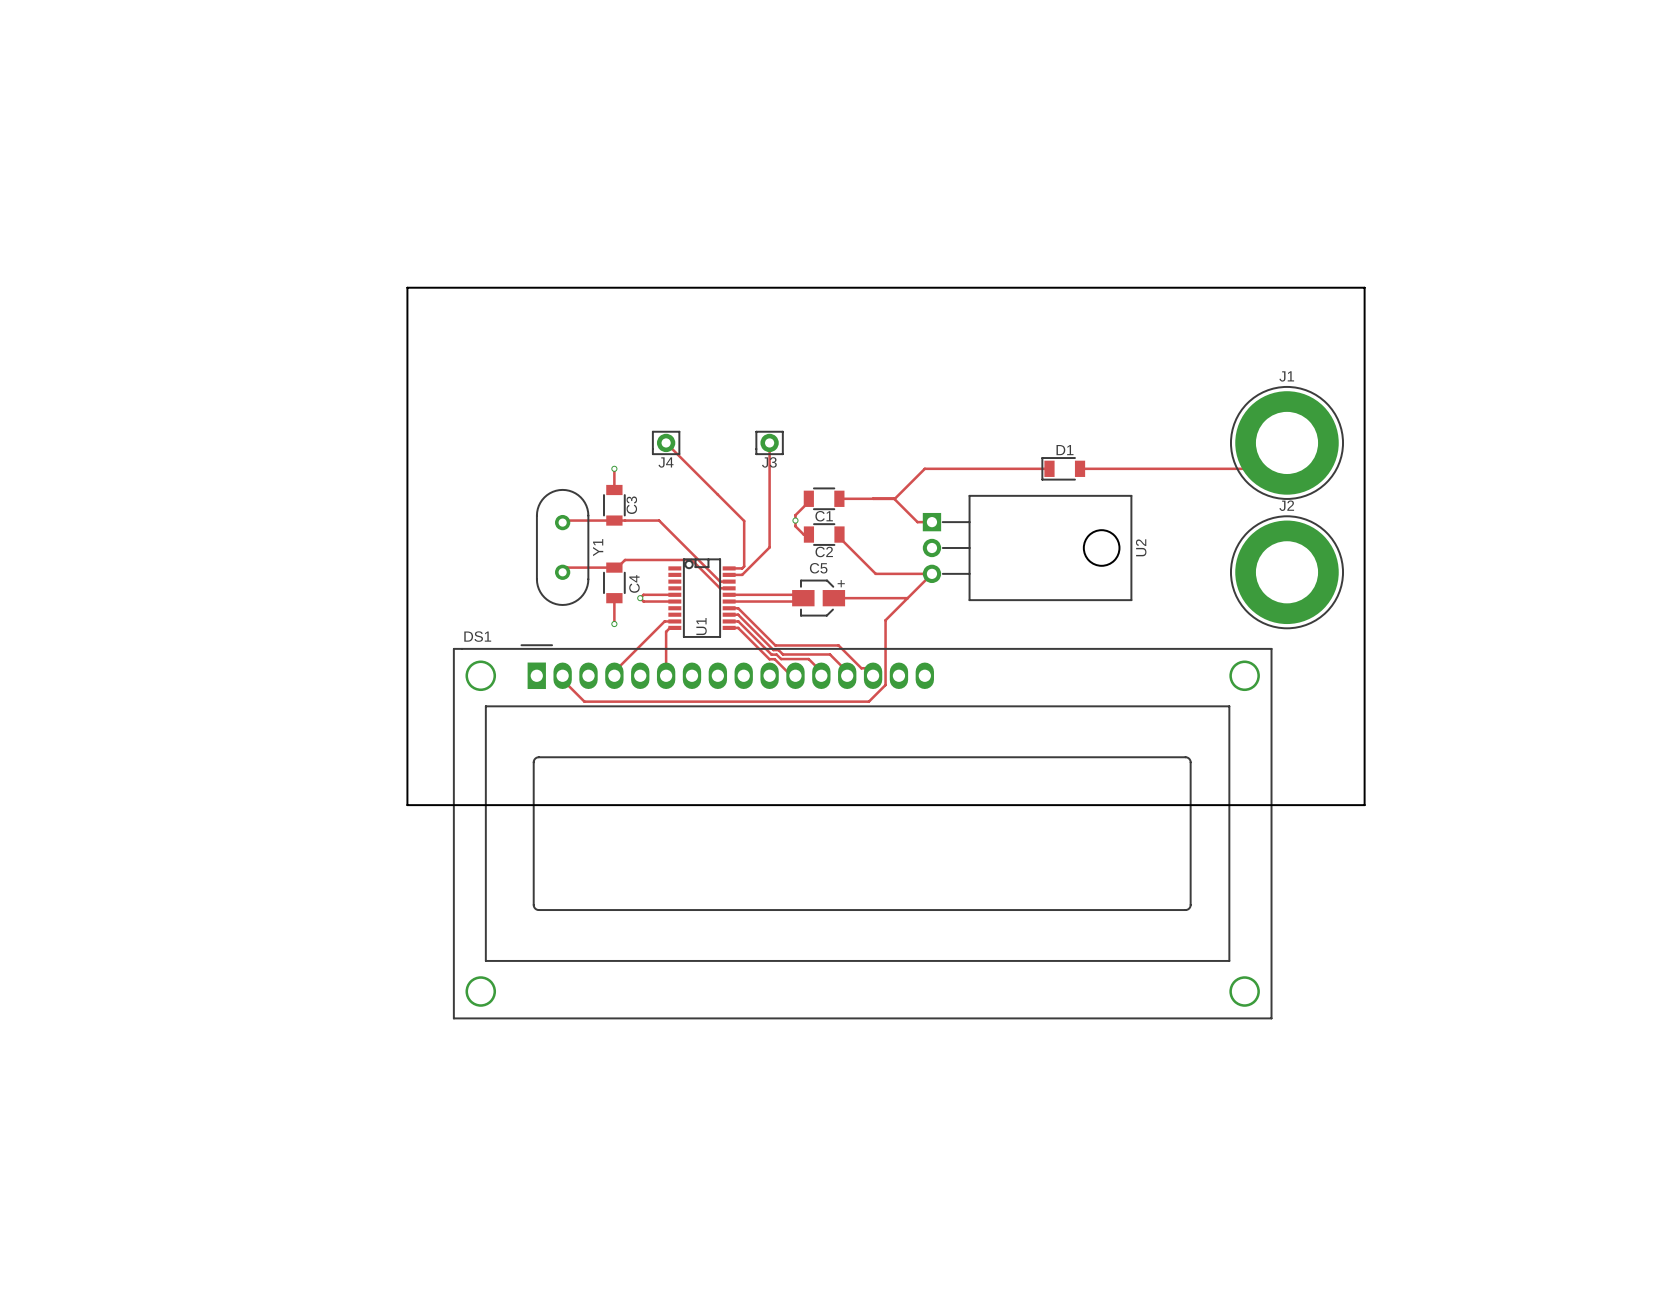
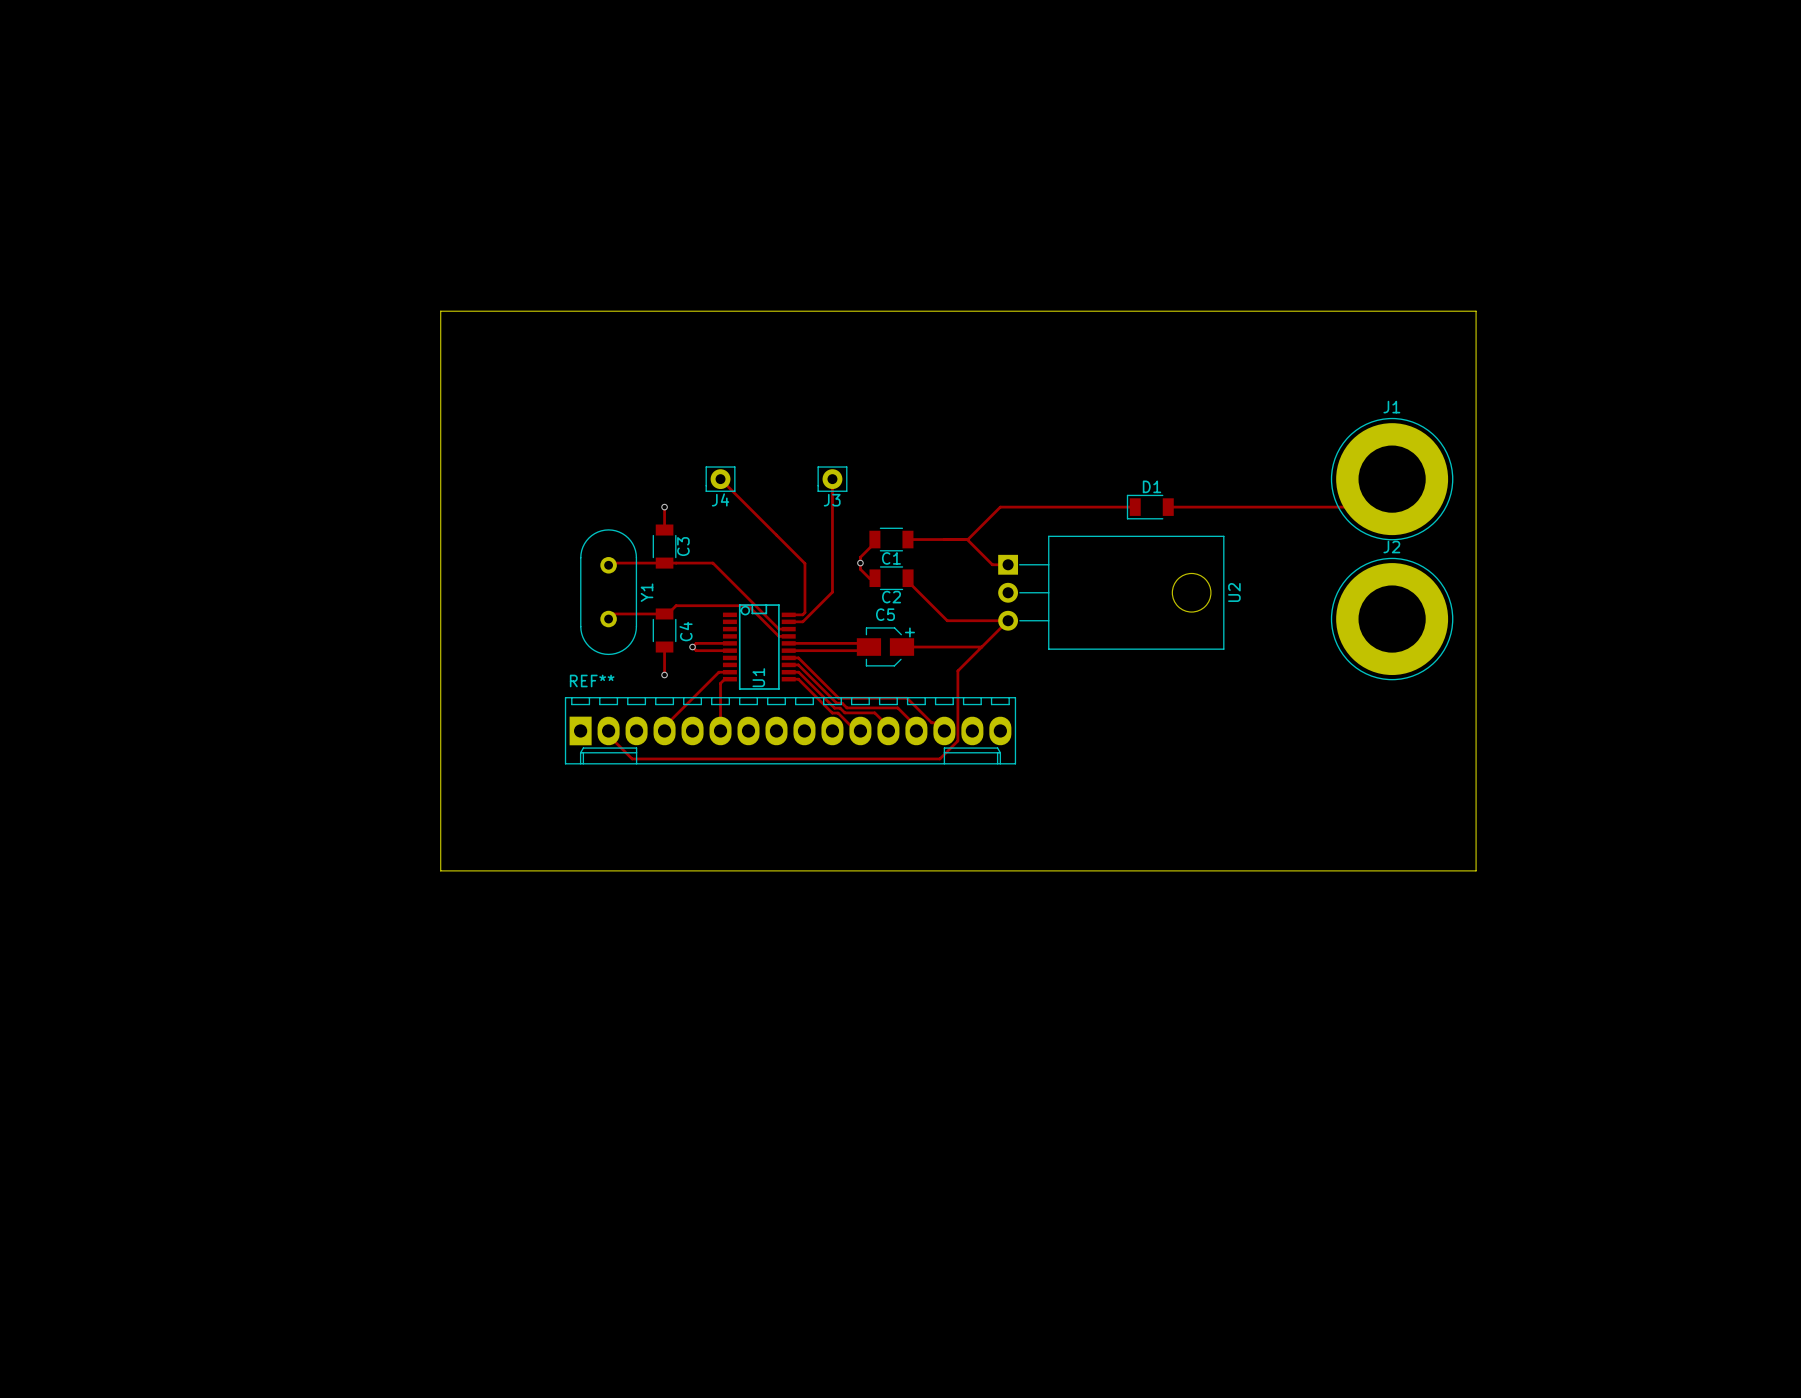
REF**: none -> (790, 730)
DS1: (862, 831) -> none

